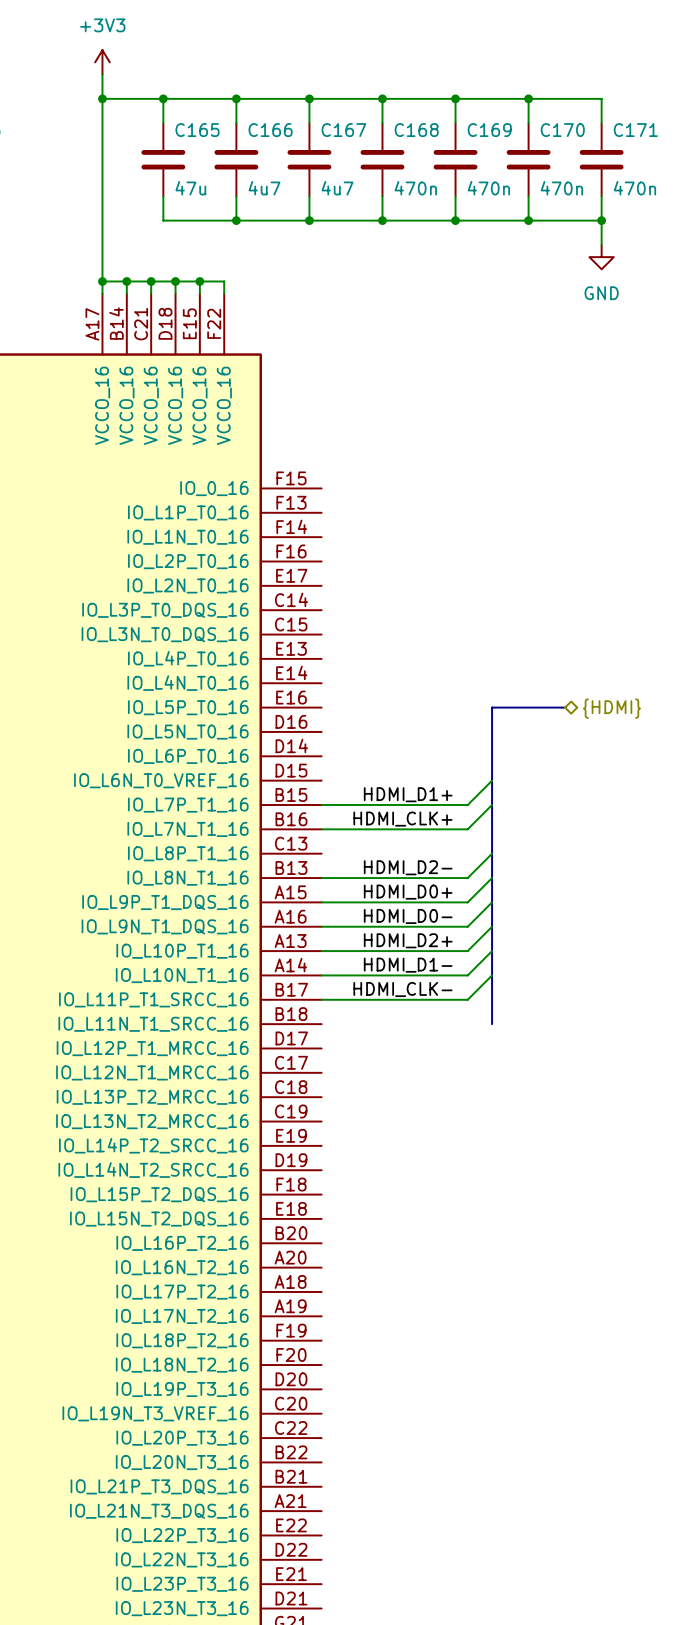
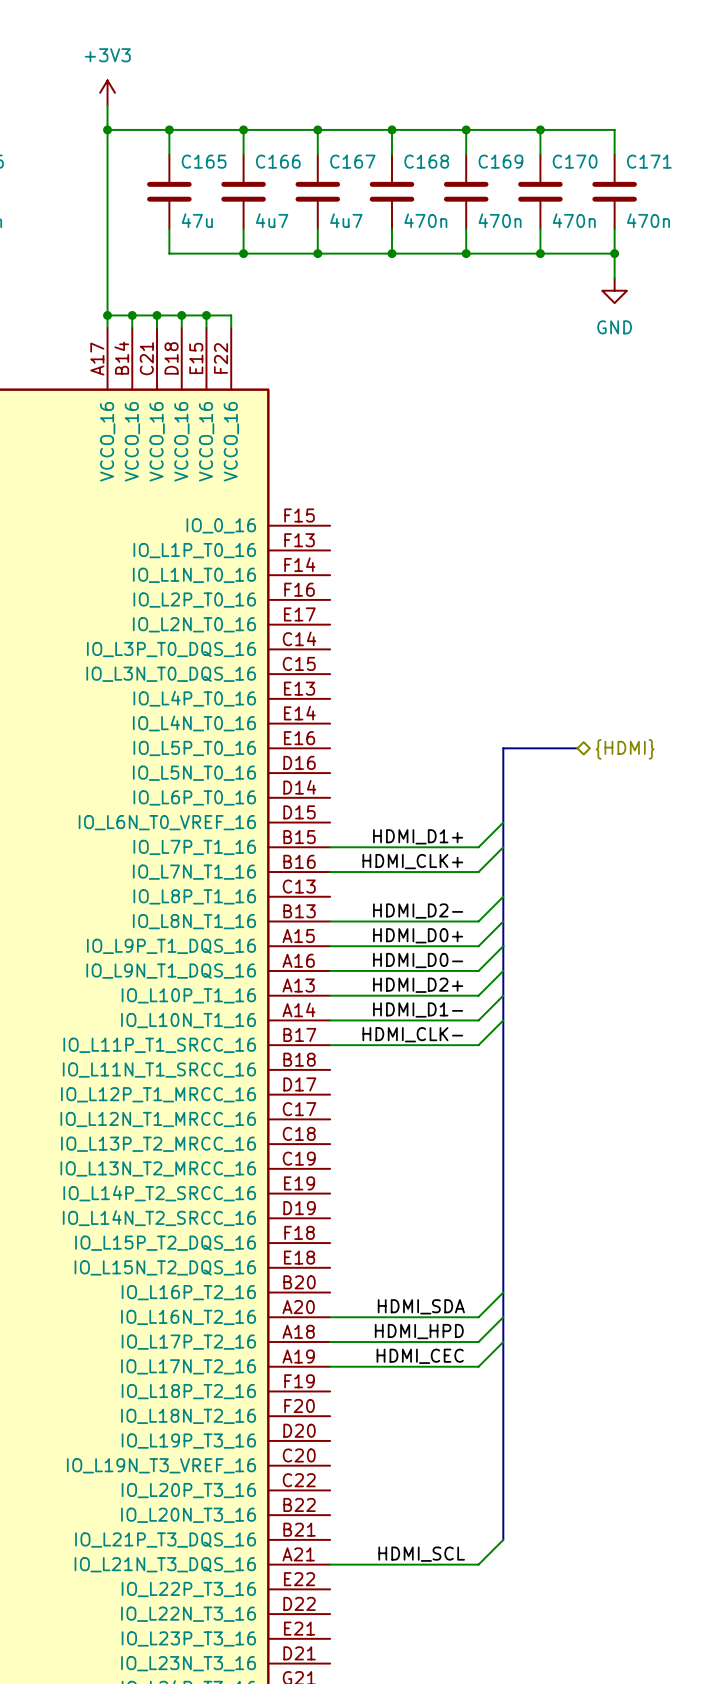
bus: none -> (503, 1069) (503, 1539)
wire: none -> (503, 1292) (478, 1317) (330, 1317)
label: none -> HDMI_SDA (421, 1306)
wire: none -> (503, 1317) (478, 1342) (330, 1342)
label: none -> HDMI_HPD (419, 1331)
wire: none -> (503, 1342) (478, 1366) (330, 1366)
label: none -> HDMI_CEC (420, 1356)
wire: none -> (503, 1539) (478, 1564) (330, 1564)
label: none -> HDMI_SCL (421, 1554)

